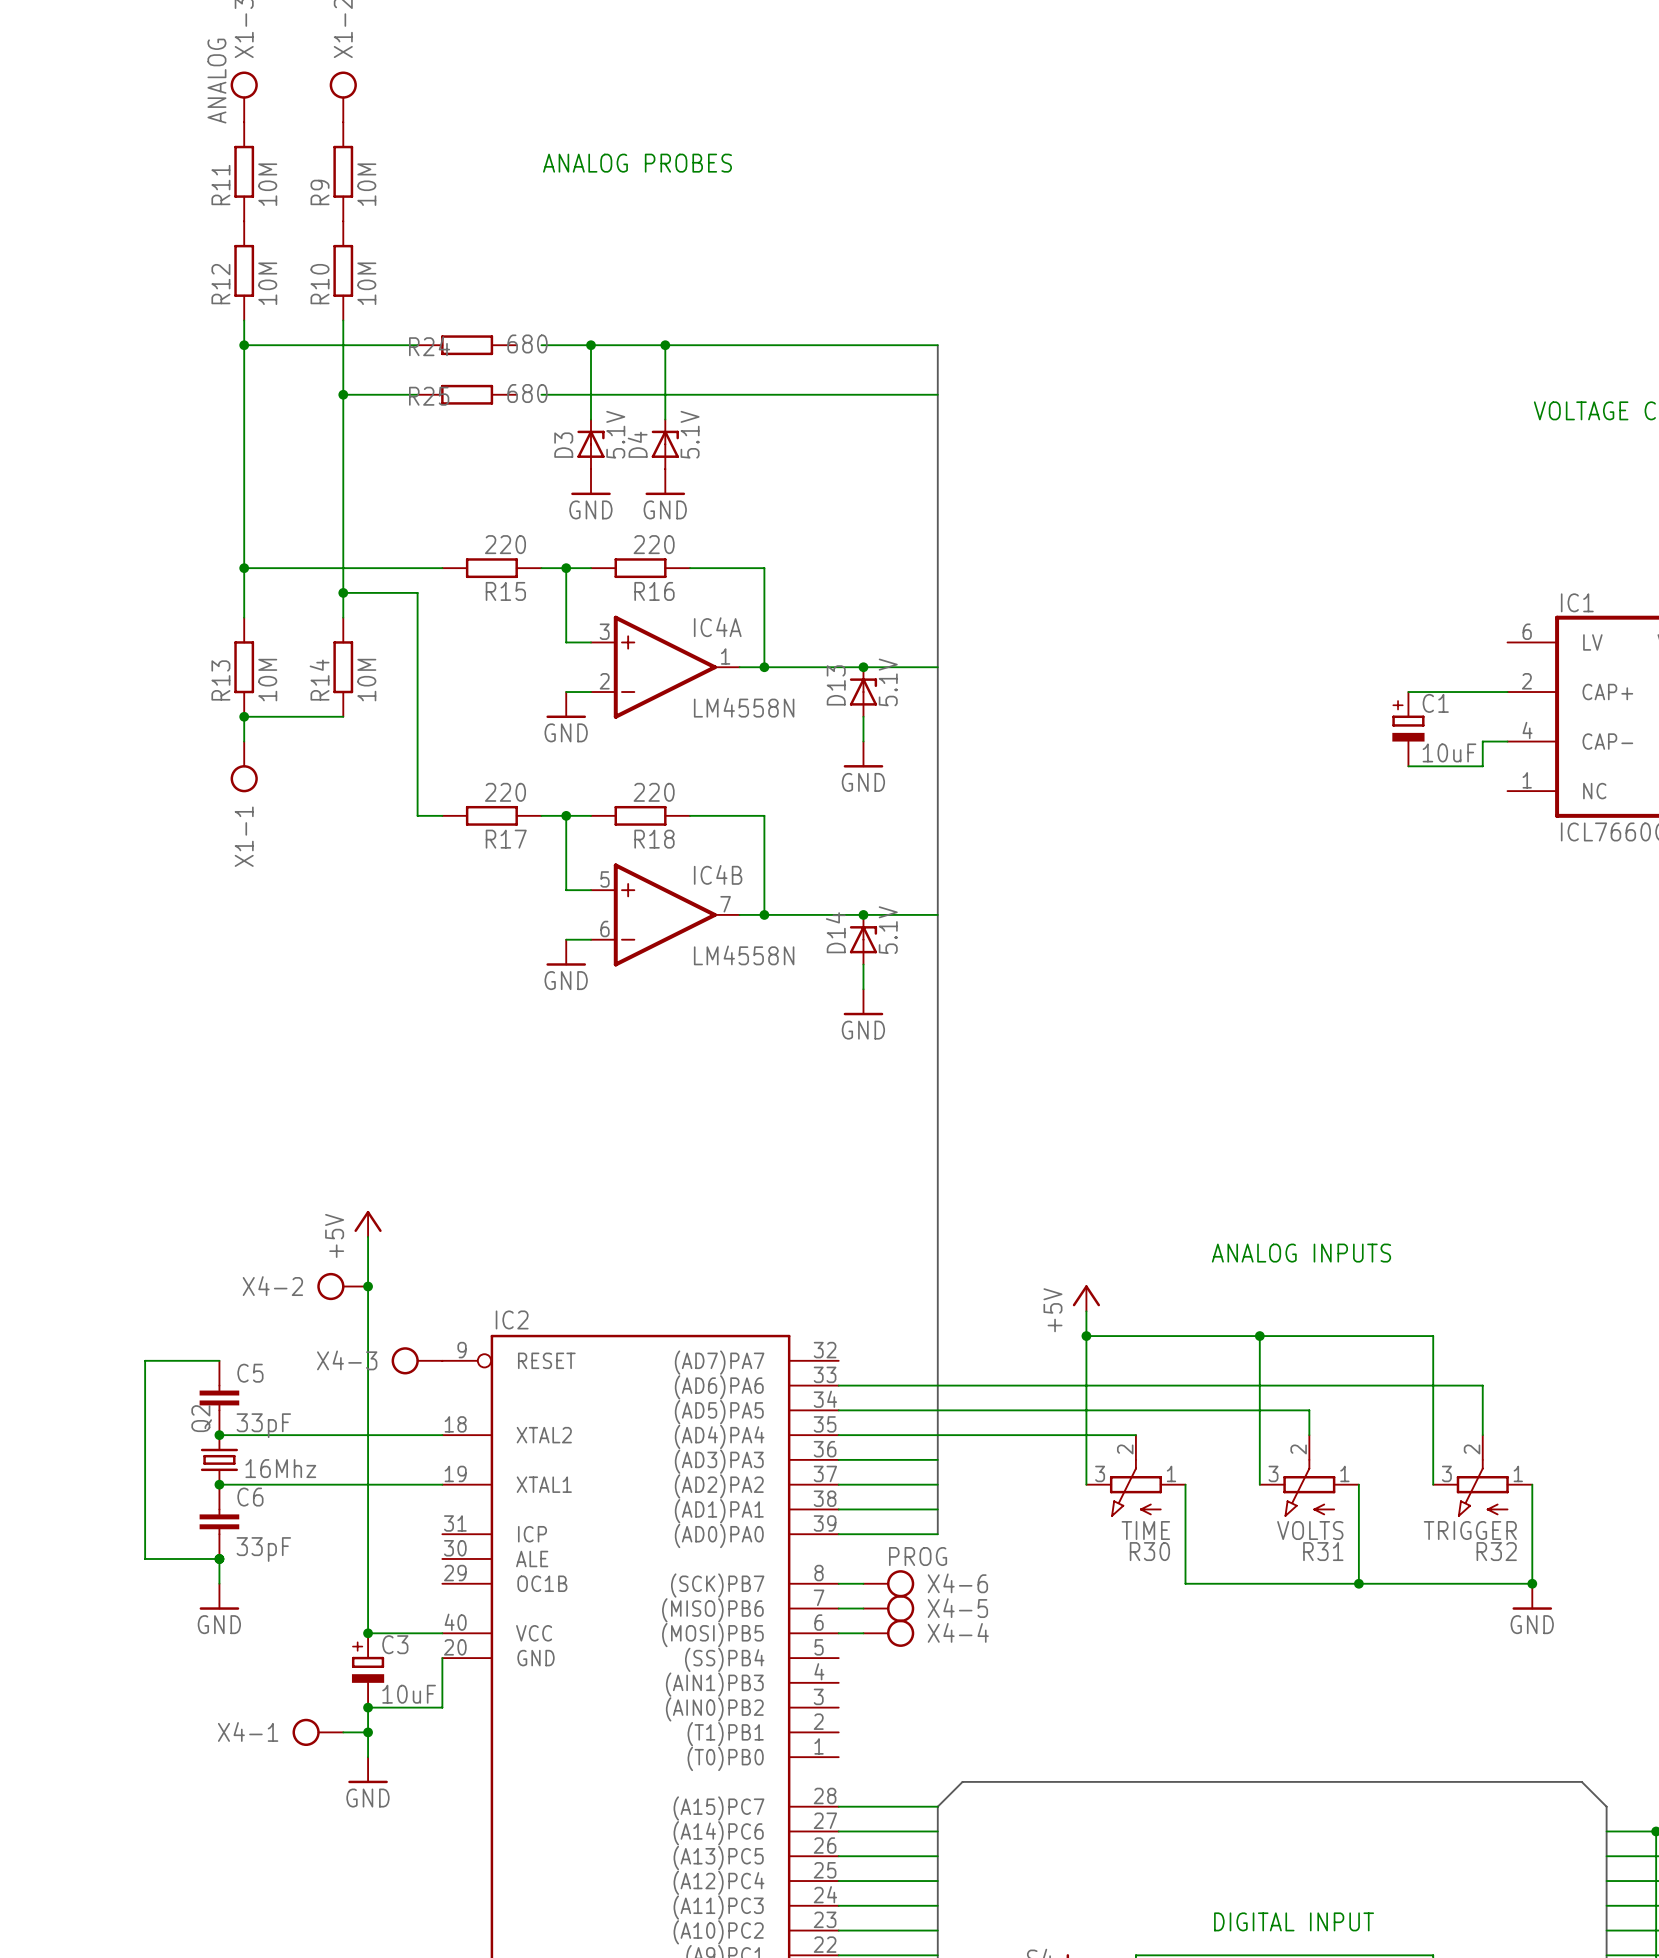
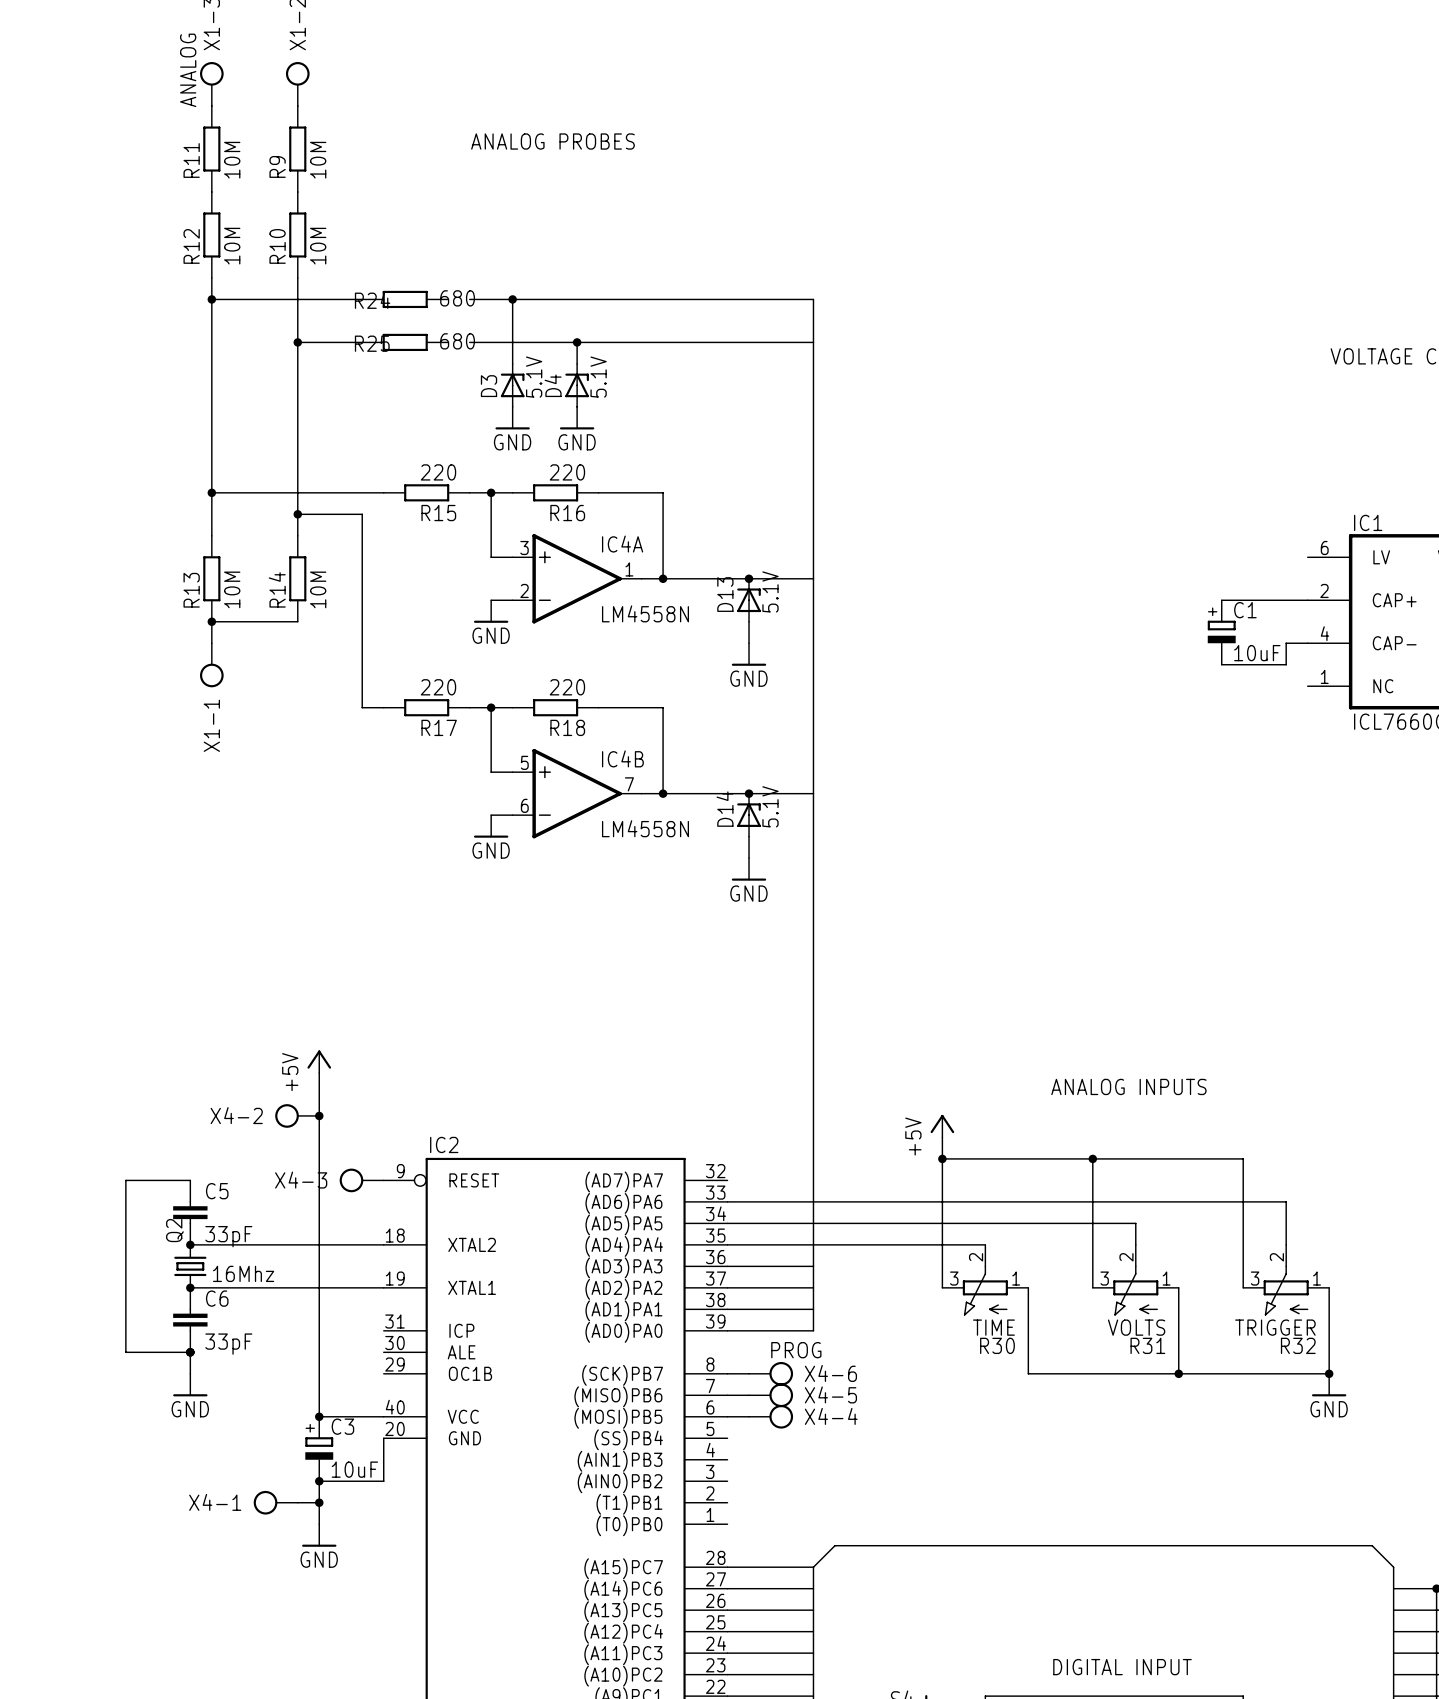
wire: (665, 345) (665, 394) -> none
junction position: (665, 345) -> (577, 342)

